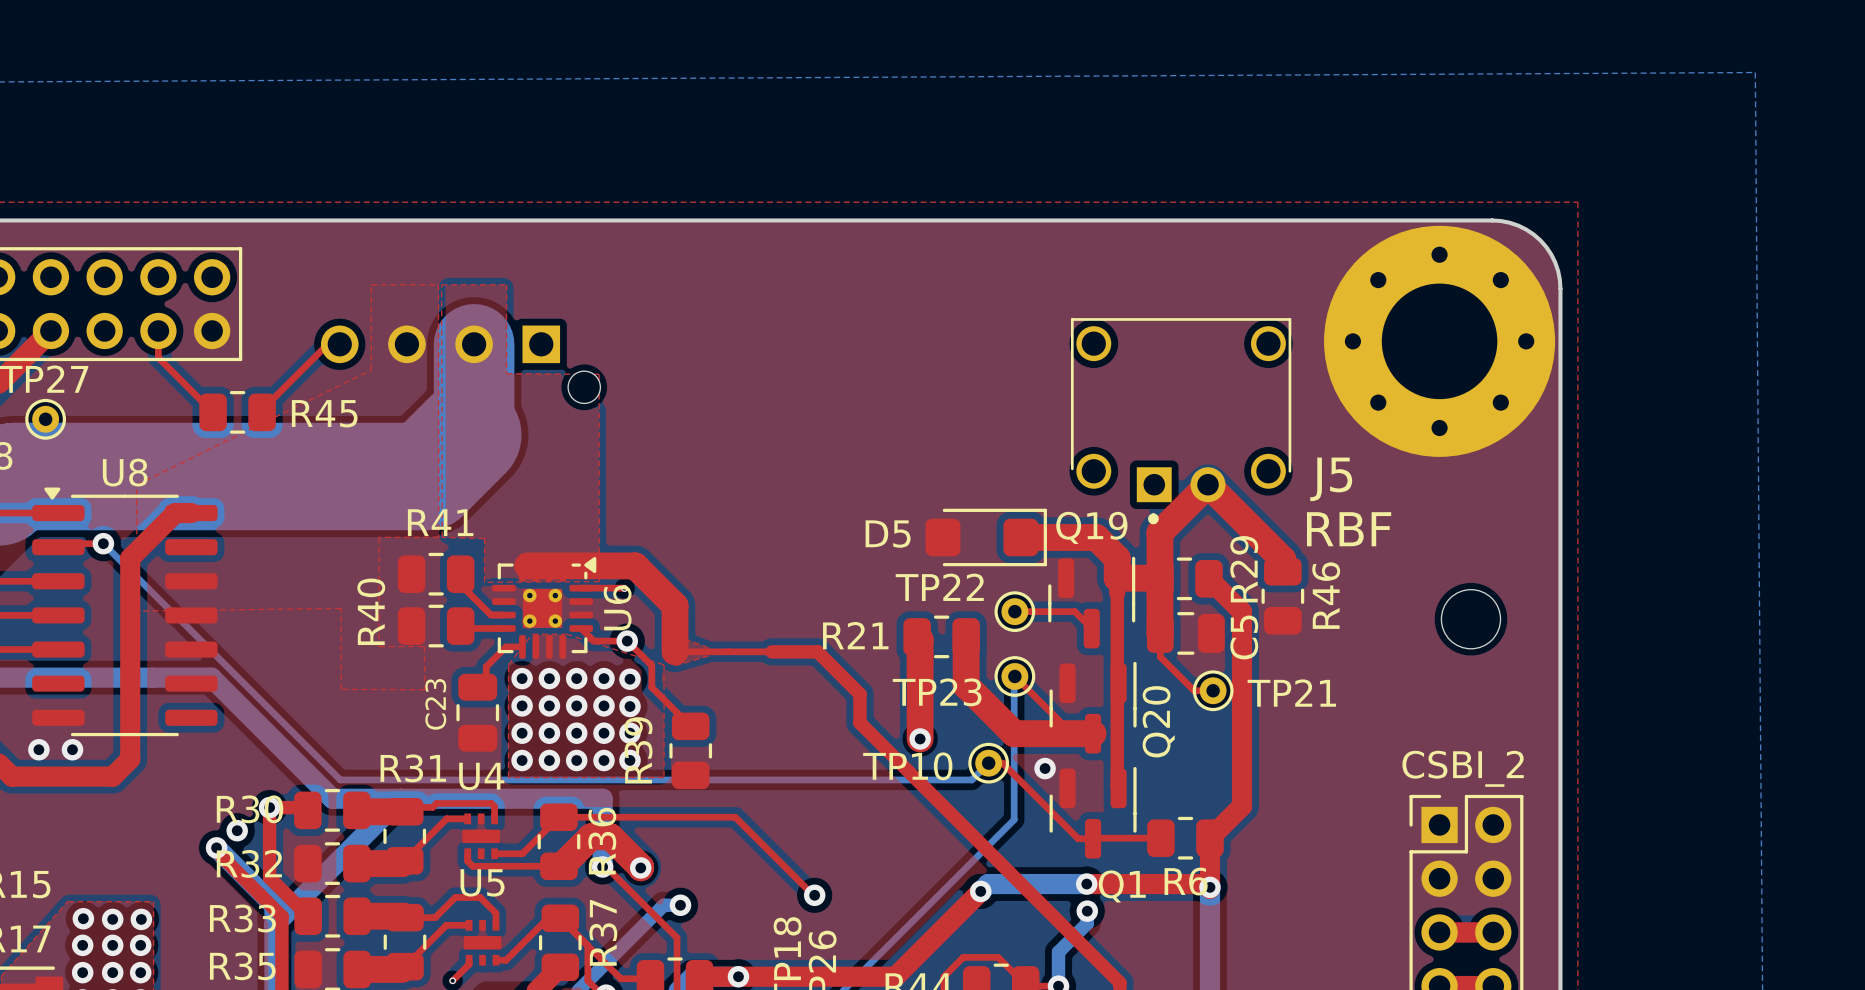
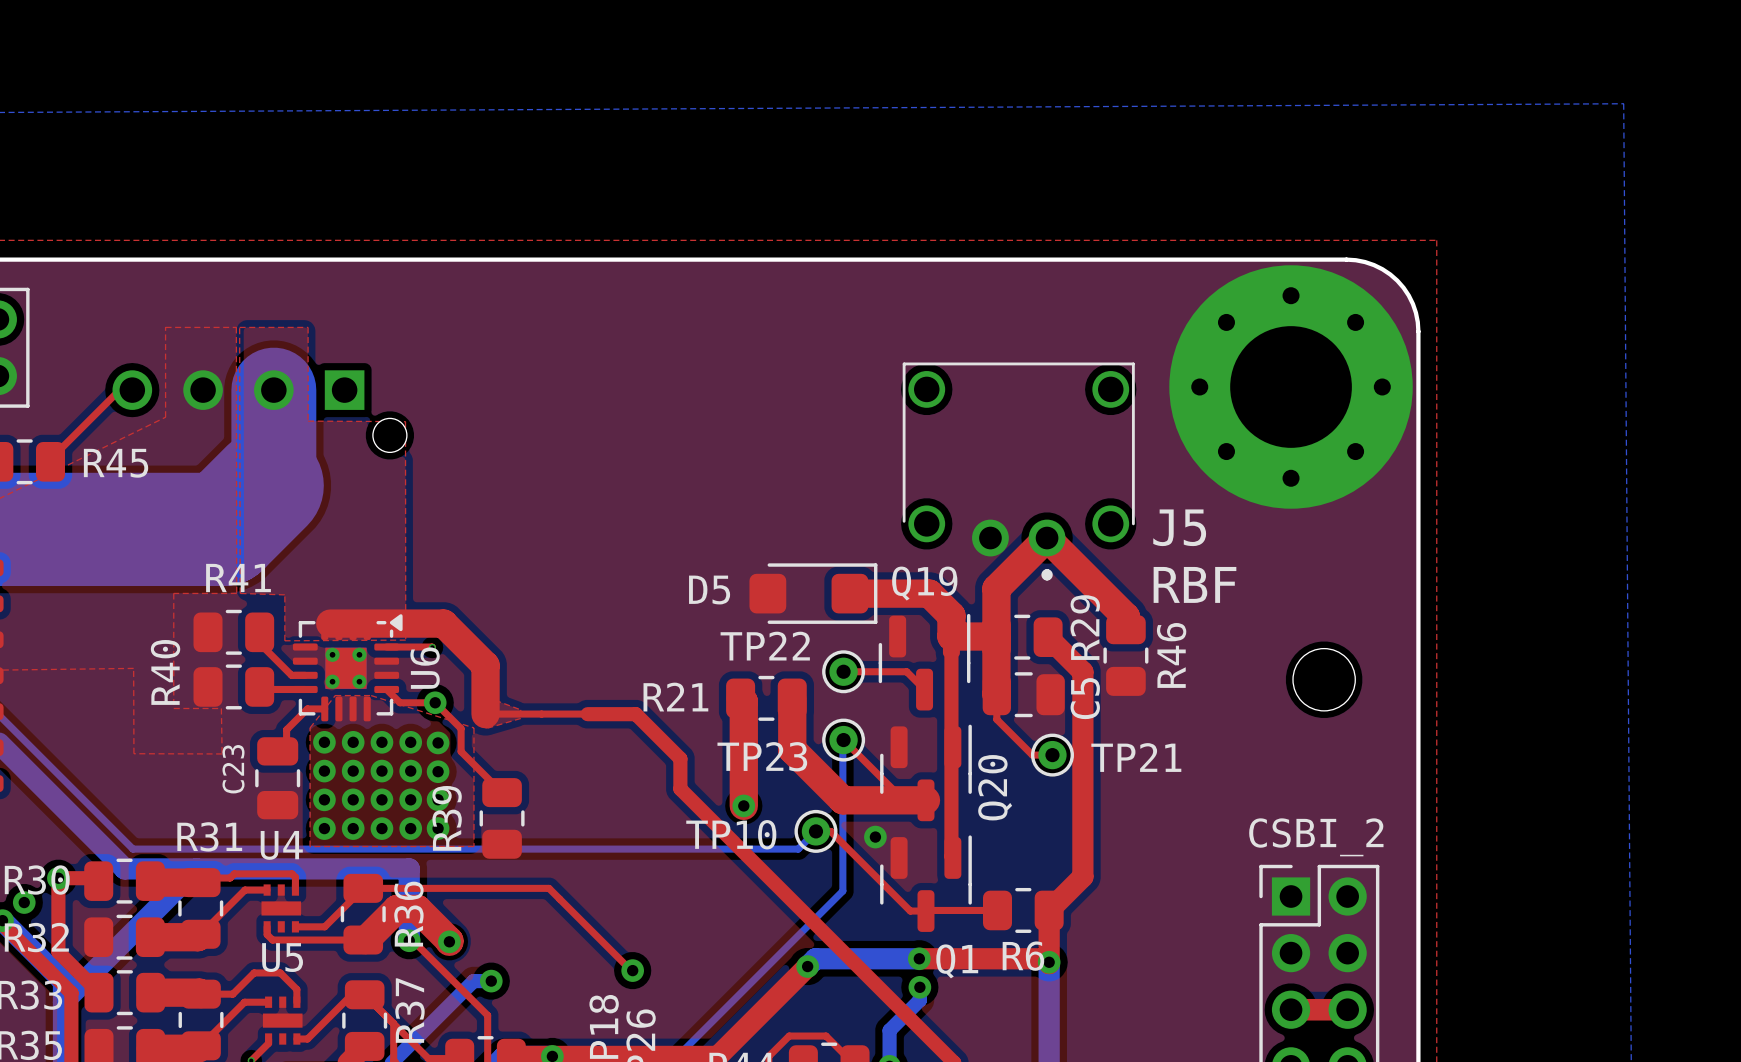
J5 footprint: [1070, 318, 1292, 525] -> [902, 362, 1135, 581]

